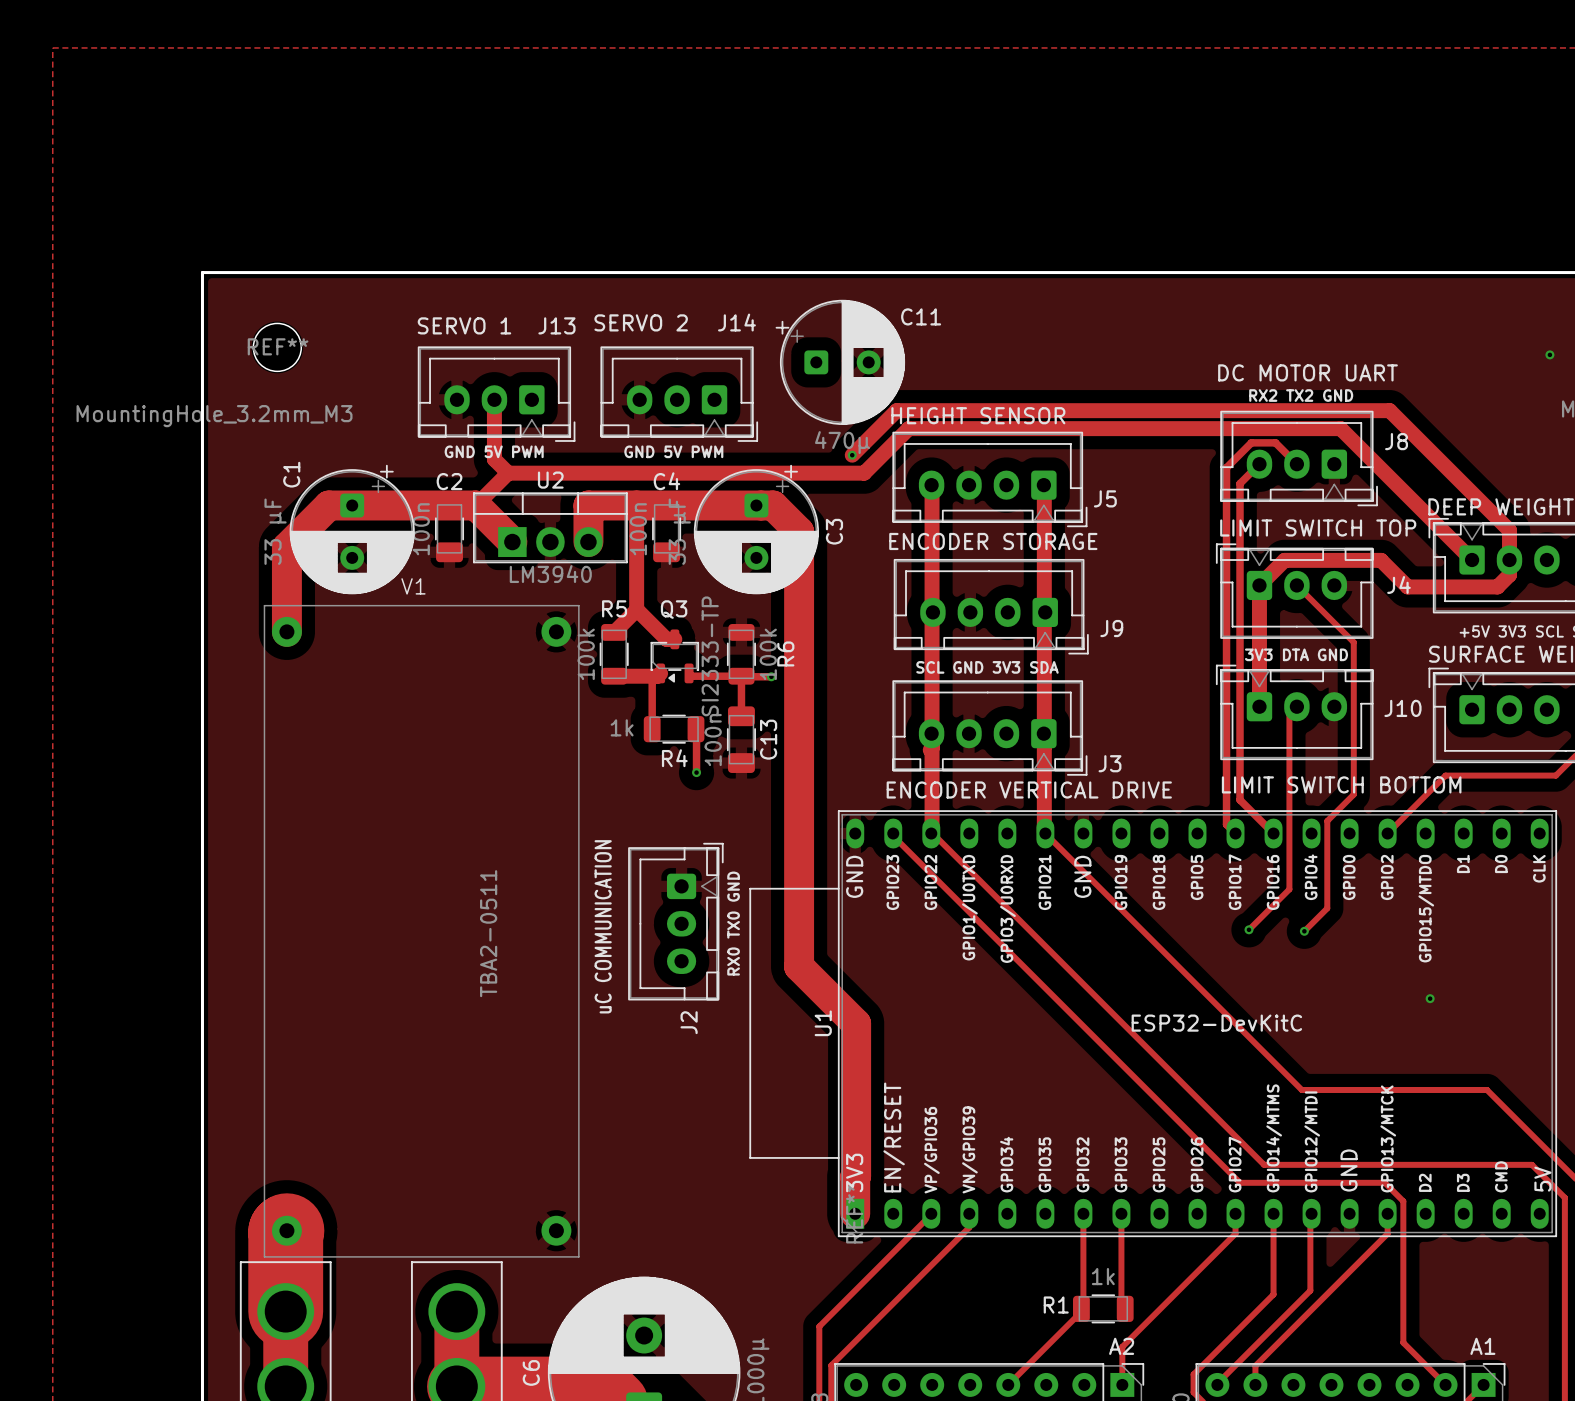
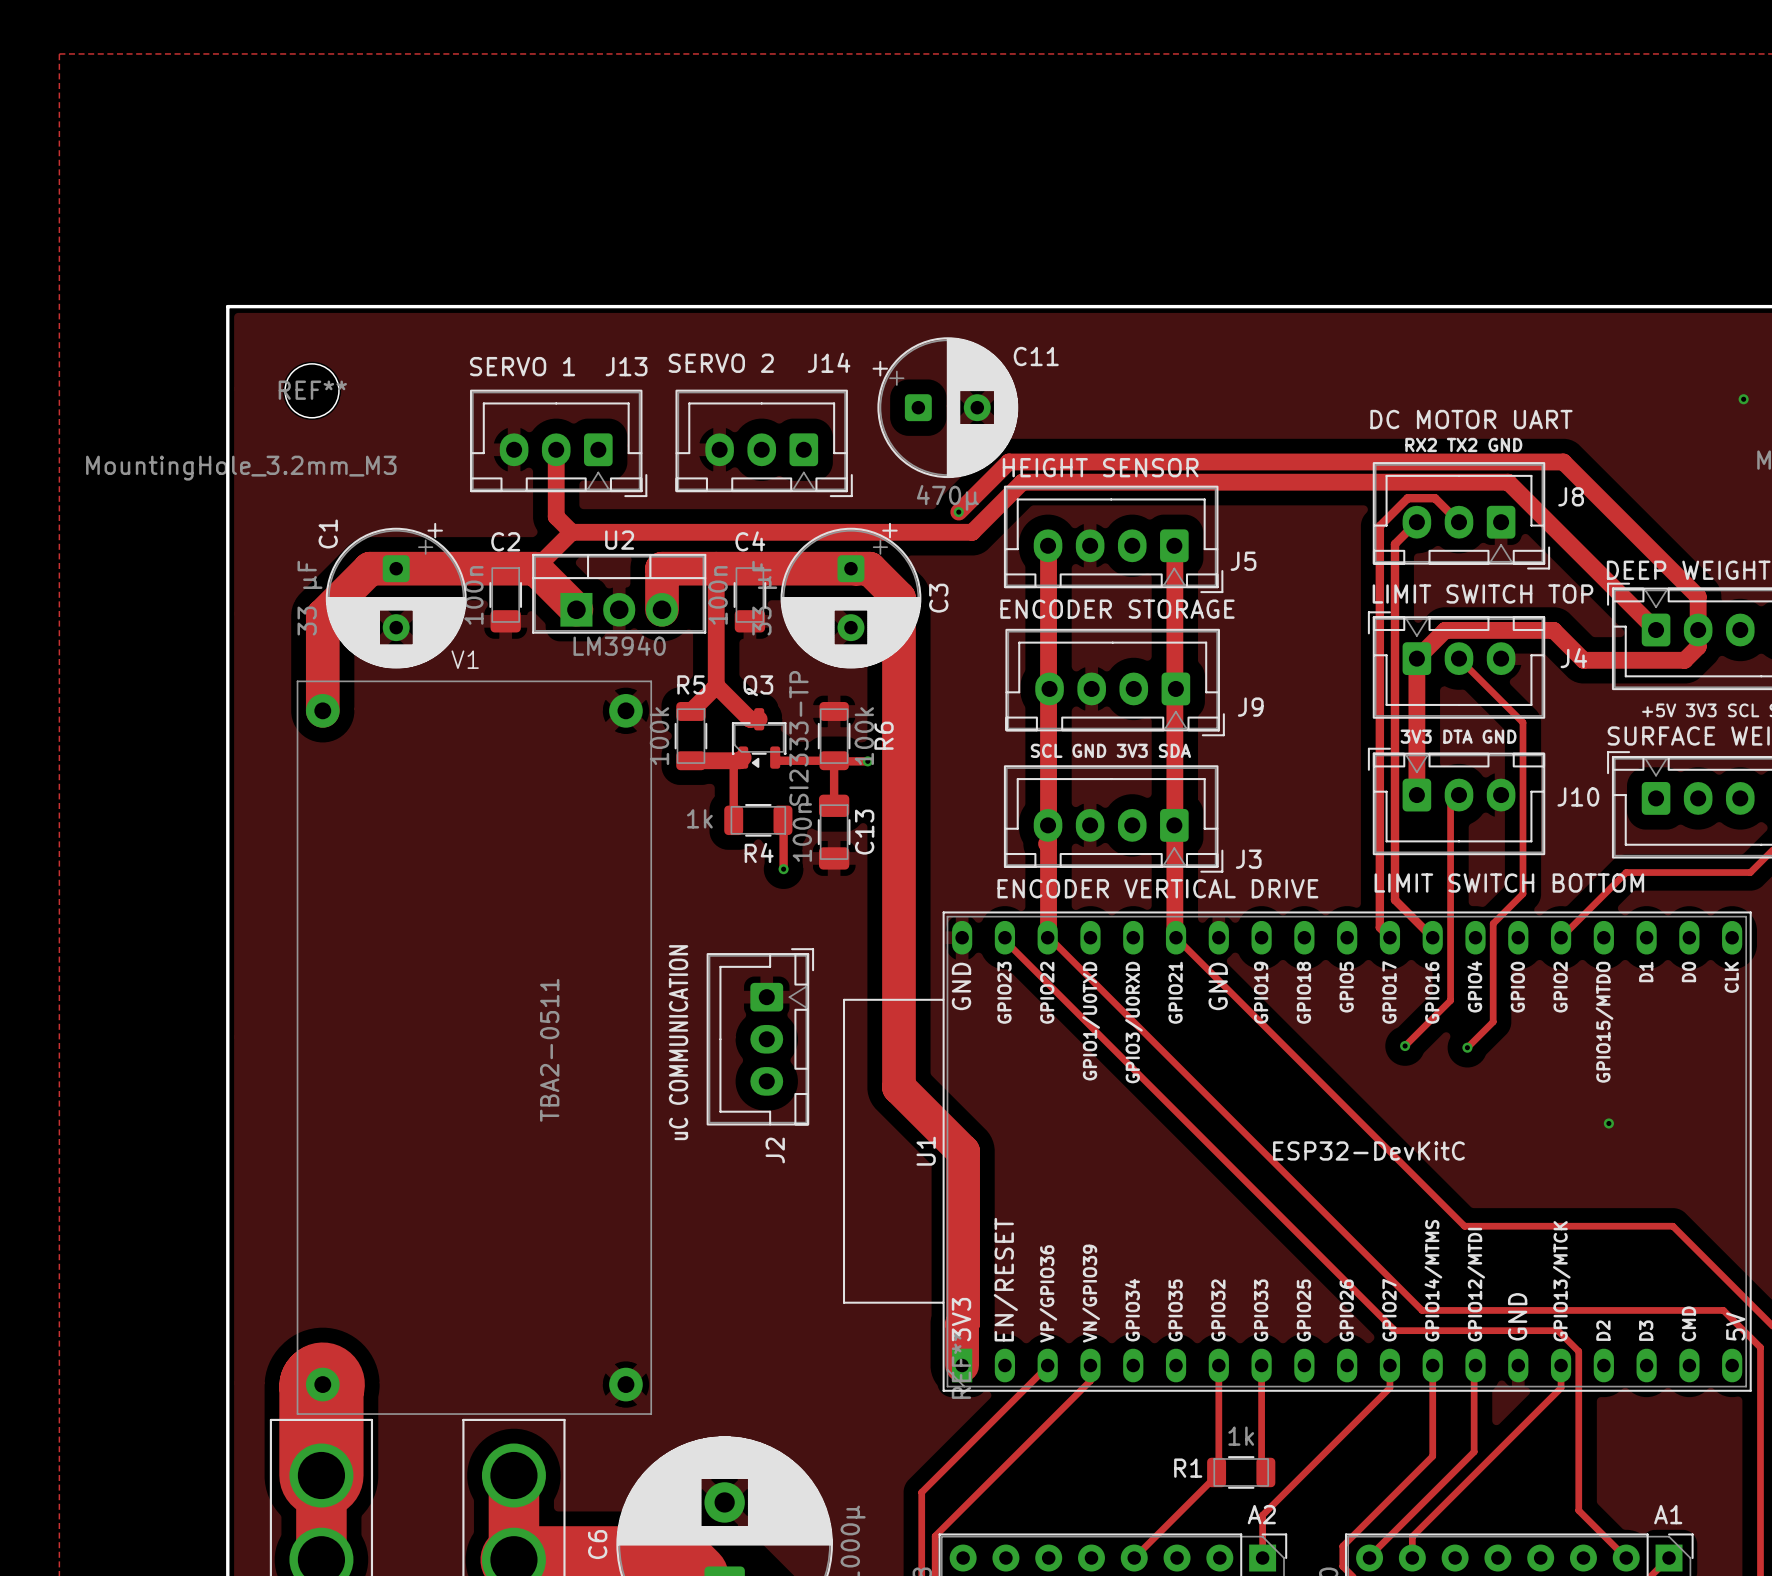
J13 text: GND 5V PWM (494, 451) -> none
J14 text: GND 5V PWM (673, 451) -> none
J2 text: RX0 TX0 GND (733, 923) -> none

